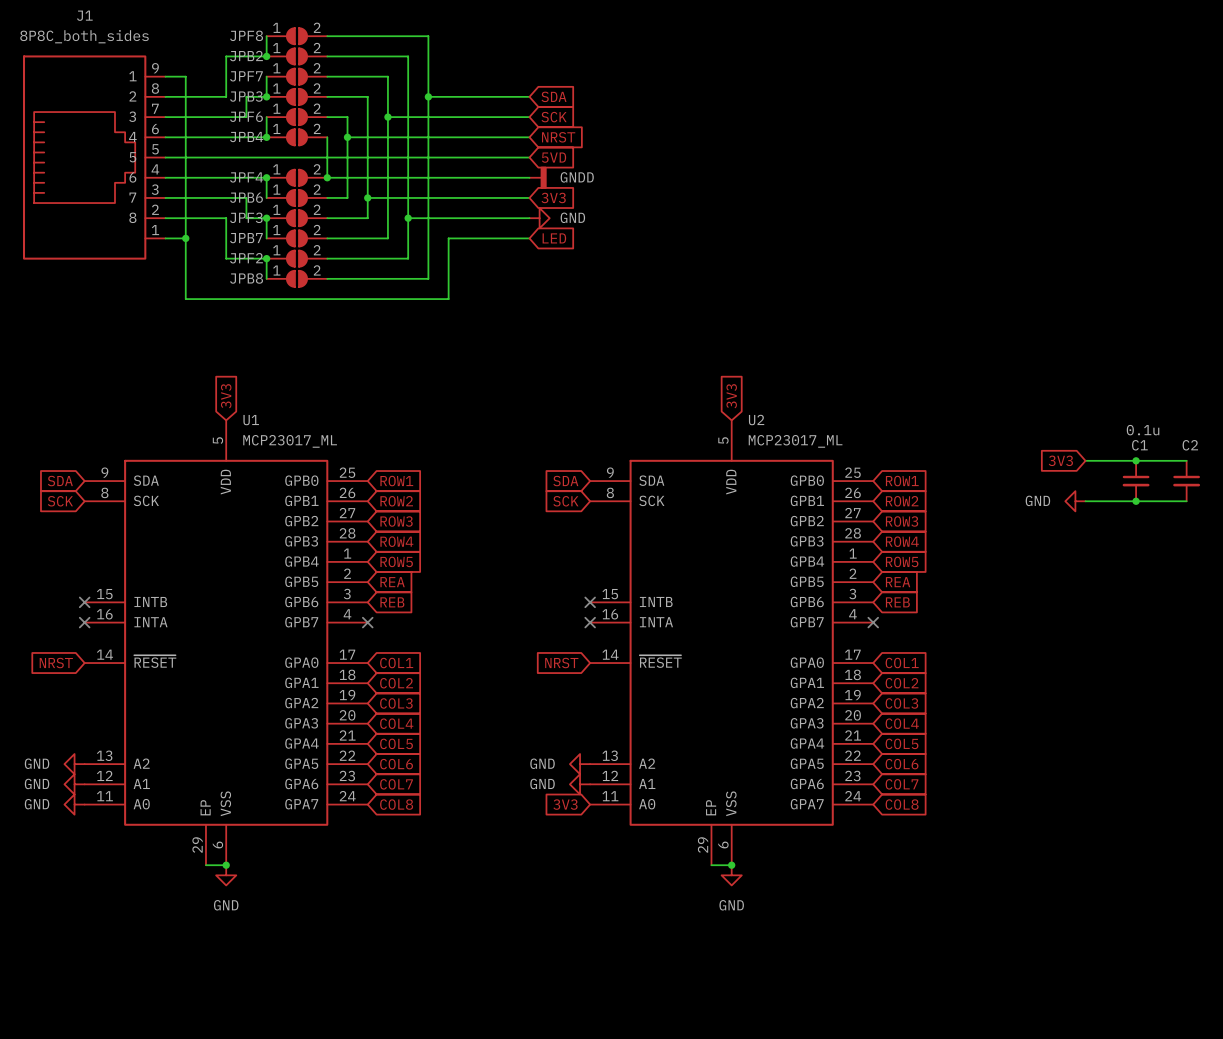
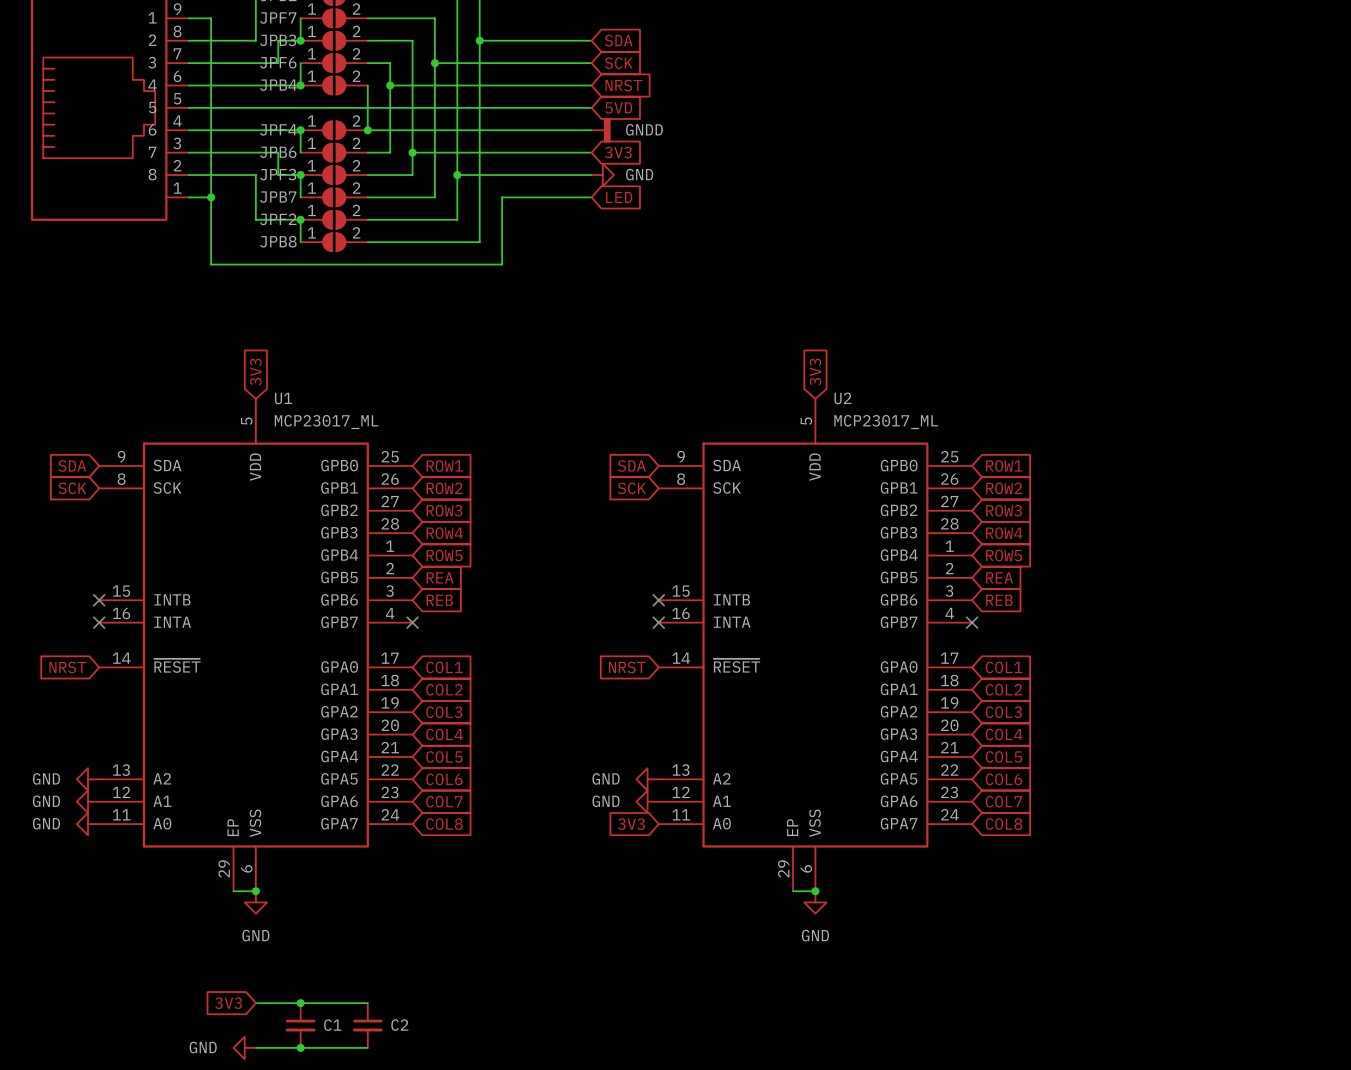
C1 value: 0.1u (1143, 430) -> none
C1 name position: C1 (1139, 445) -> C1 (332, 1025)
C2 name position: C2 (1190, 445) -> C2 (399, 1025)
global label: 3V3 (1060, 460) -> none
wire: (1085, 460) (1186, 460) -> none
junction: (1136, 460) -> none
C1 position: (1136, 481) -> (300, 1025)
C2 position: (1186, 481) -> (367, 1025)
power symbol: GND (1075, 501) -> none
wire: (1085, 501) (1186, 501) -> none
junction: (1136, 501) -> none
global label: none -> 3V3 (228, 1003)
wire: none -> (255, 1003) (367, 1003)
junction: none -> (300, 1003)
power symbol: none -> GND (244, 1047)
wire: none -> (255, 1047) (367, 1047)
junction: none -> (300, 1047)

